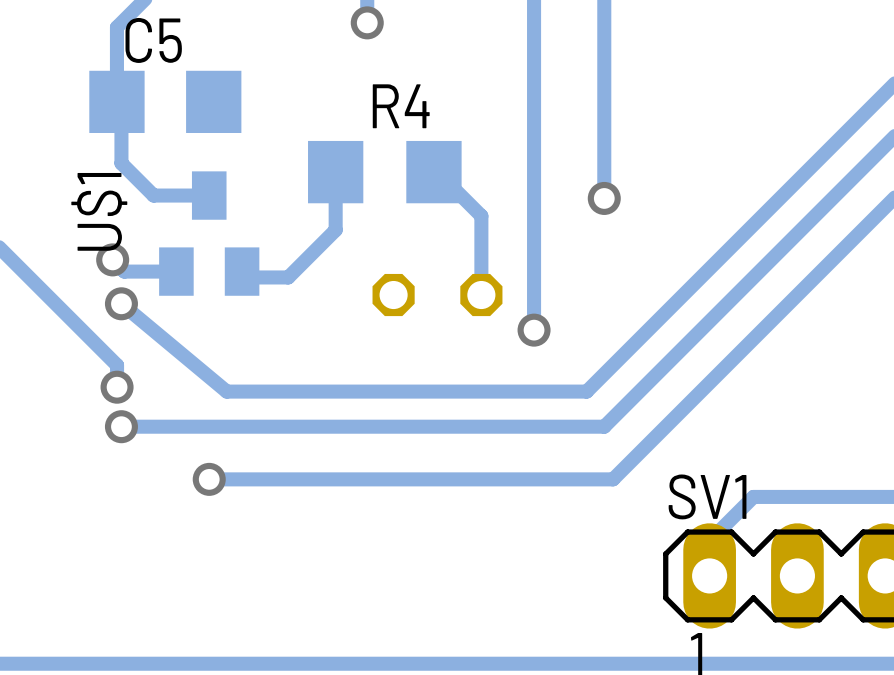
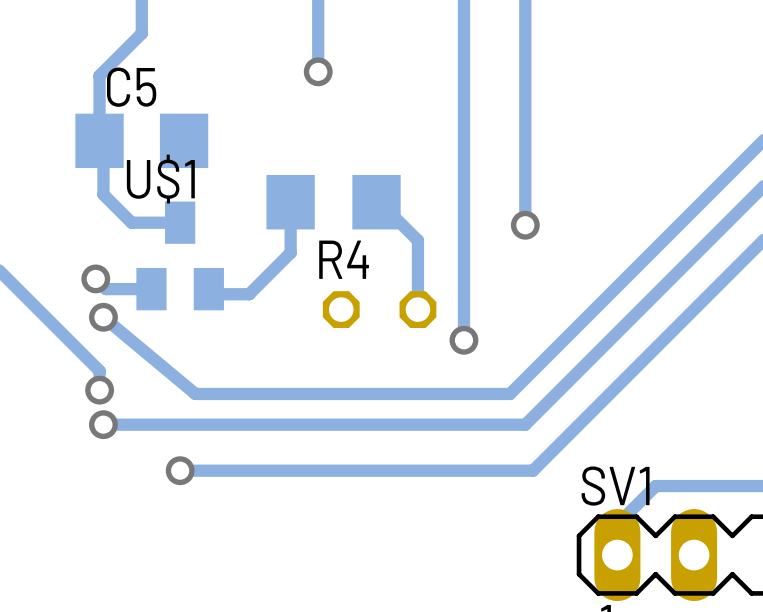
R4 name position: R4 (401, 106) -> R4 (344, 259)
U$1 name rotation: 0° (99, 211) -> 90° clockwise (160, 179)
U$1 name position: U$1 (99, 211) -> U$1 (160, 179)

